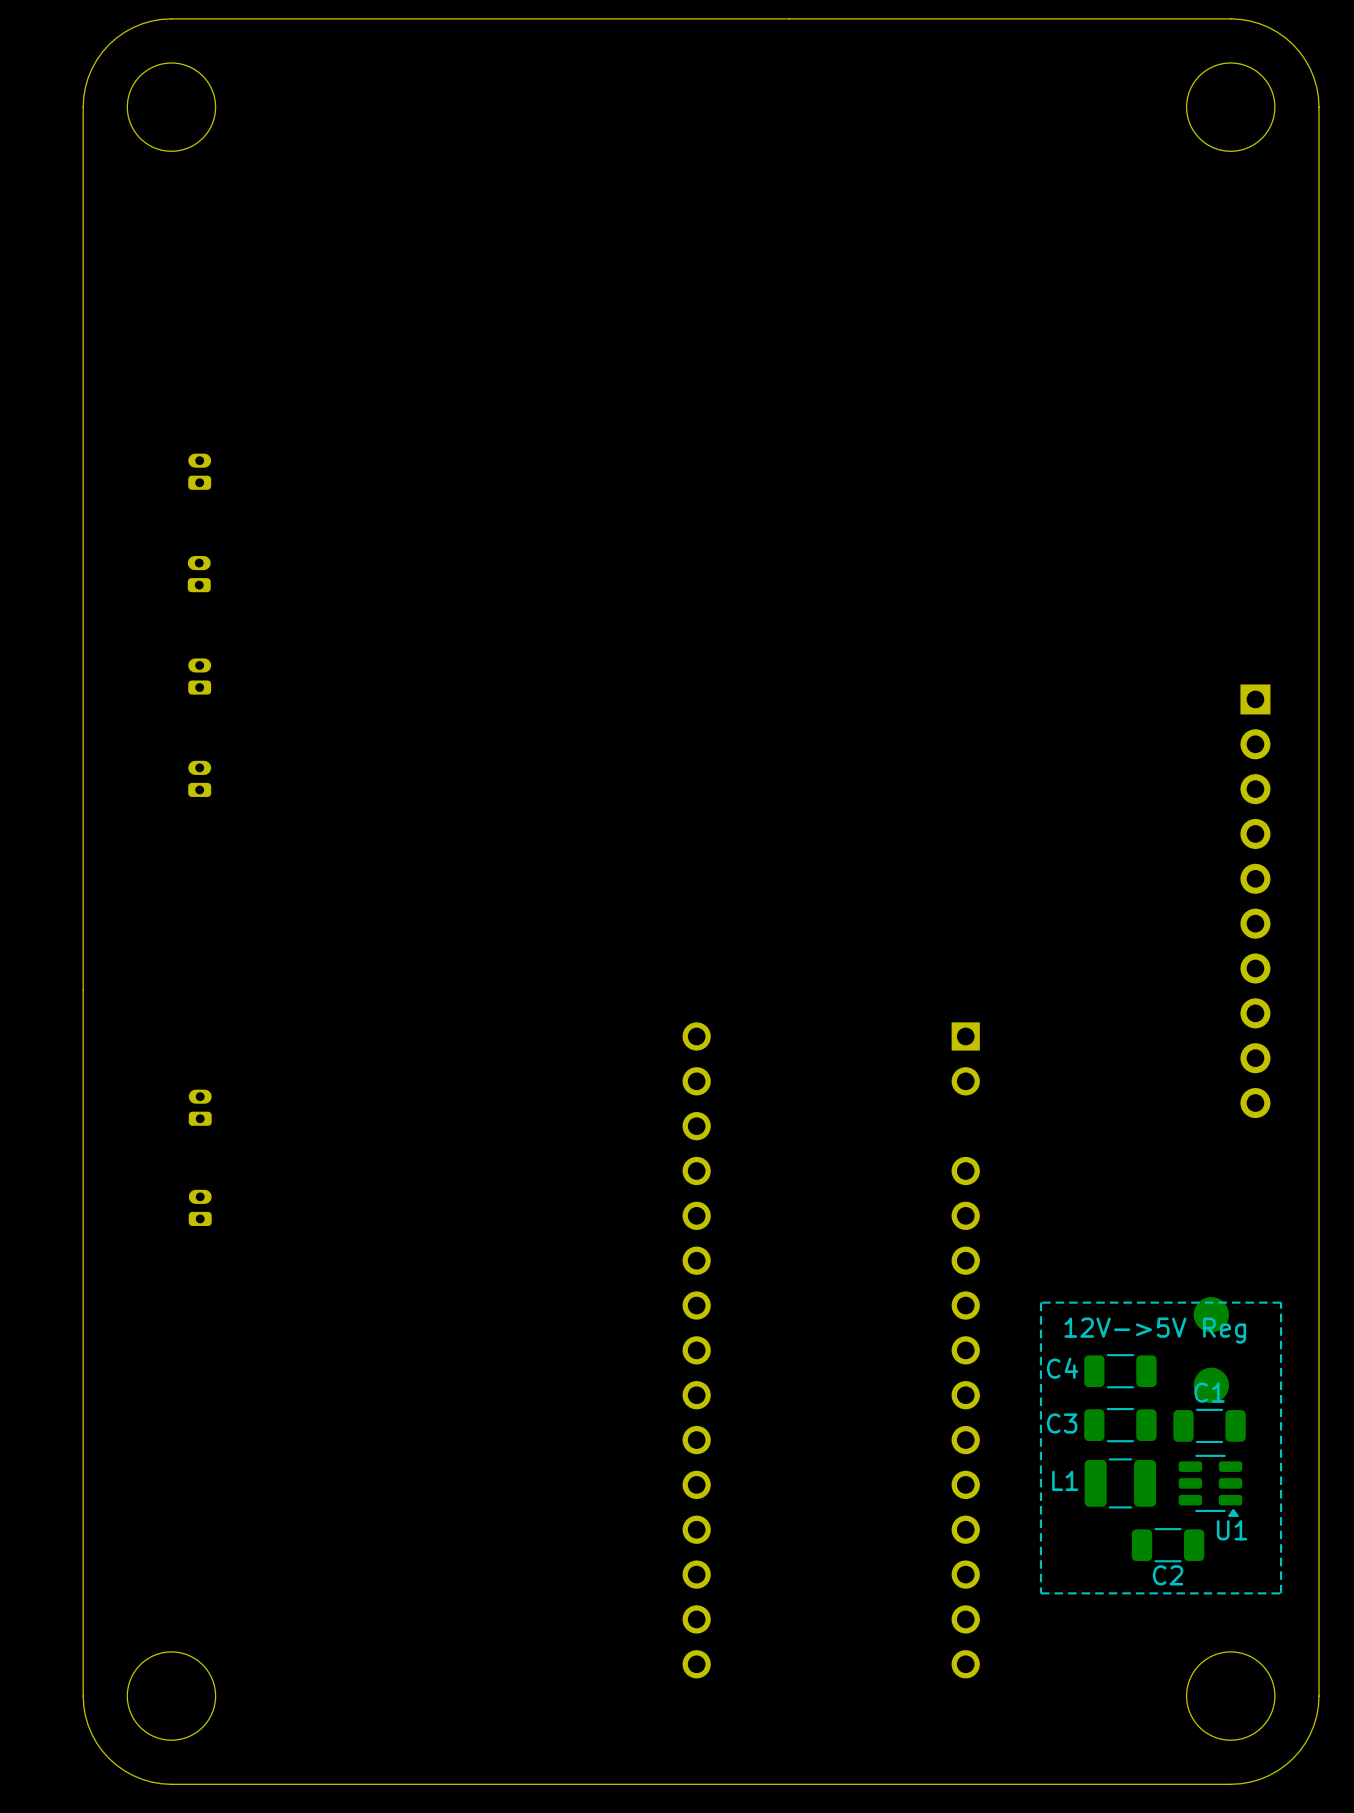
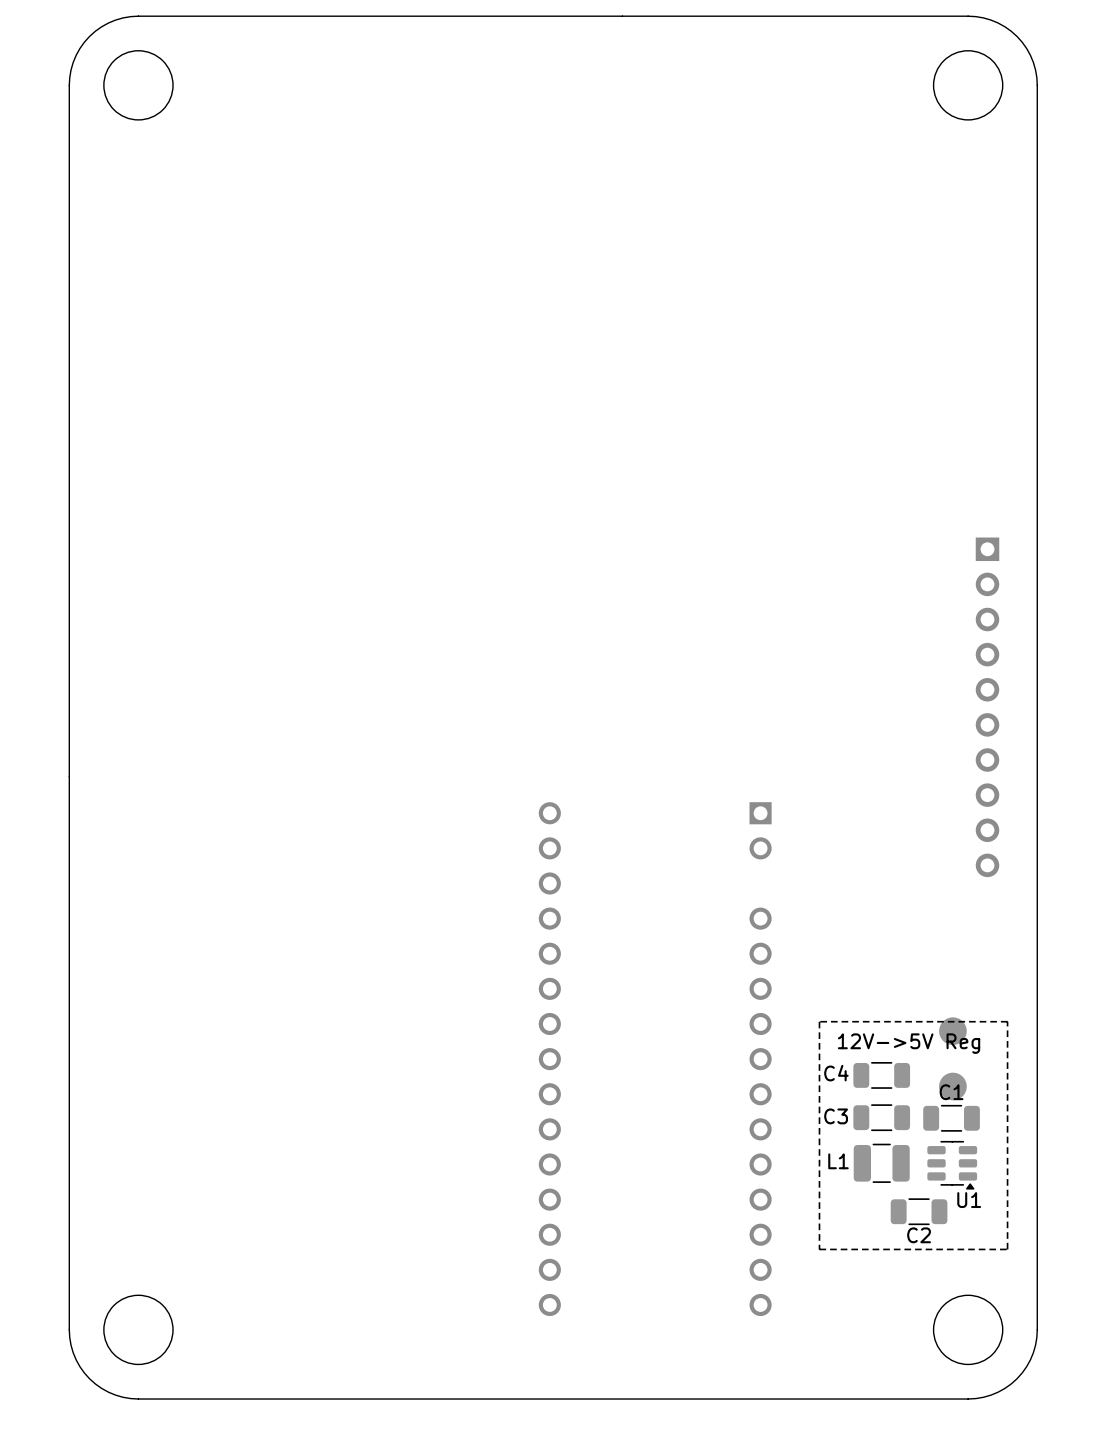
part: (199, 471) -> none
part: (199, 574) -> none
part: (199, 676) -> none
part: (199, 778) -> none
part: (200, 1107) -> none
part: (200, 1207) -> none

